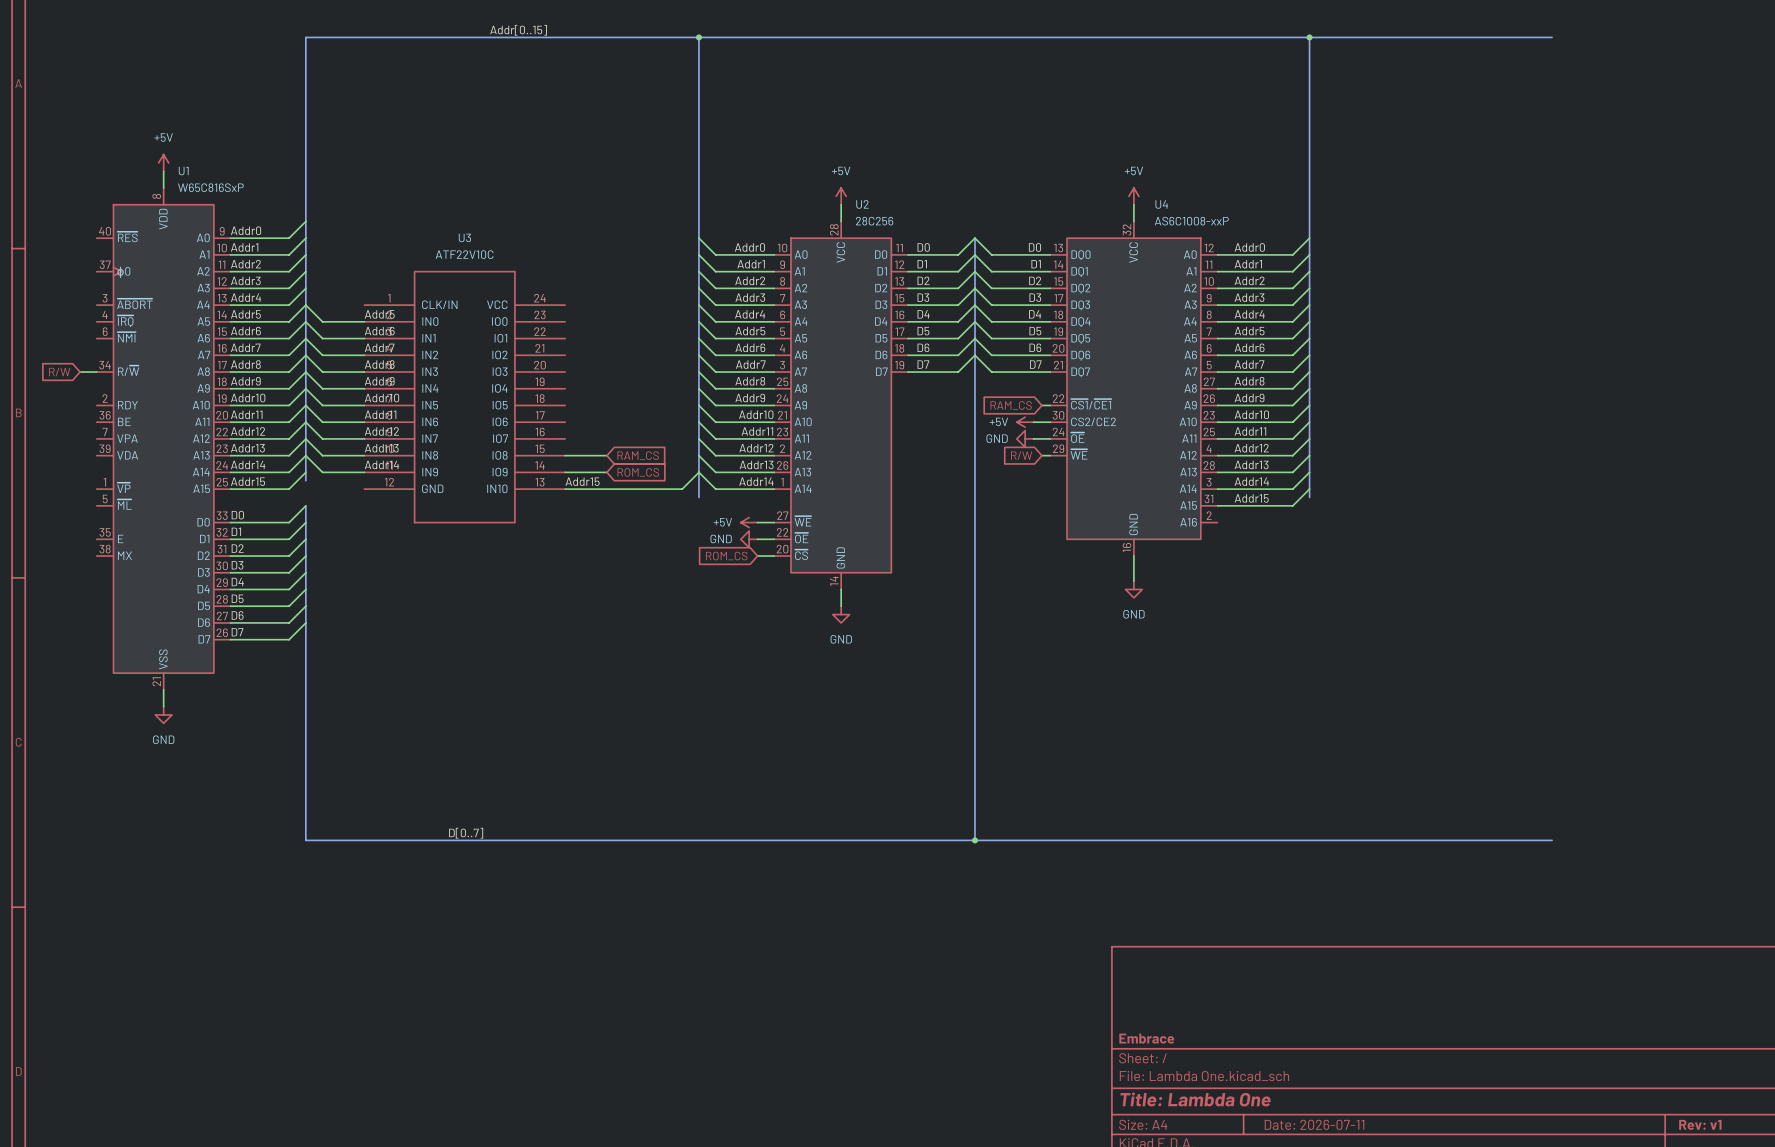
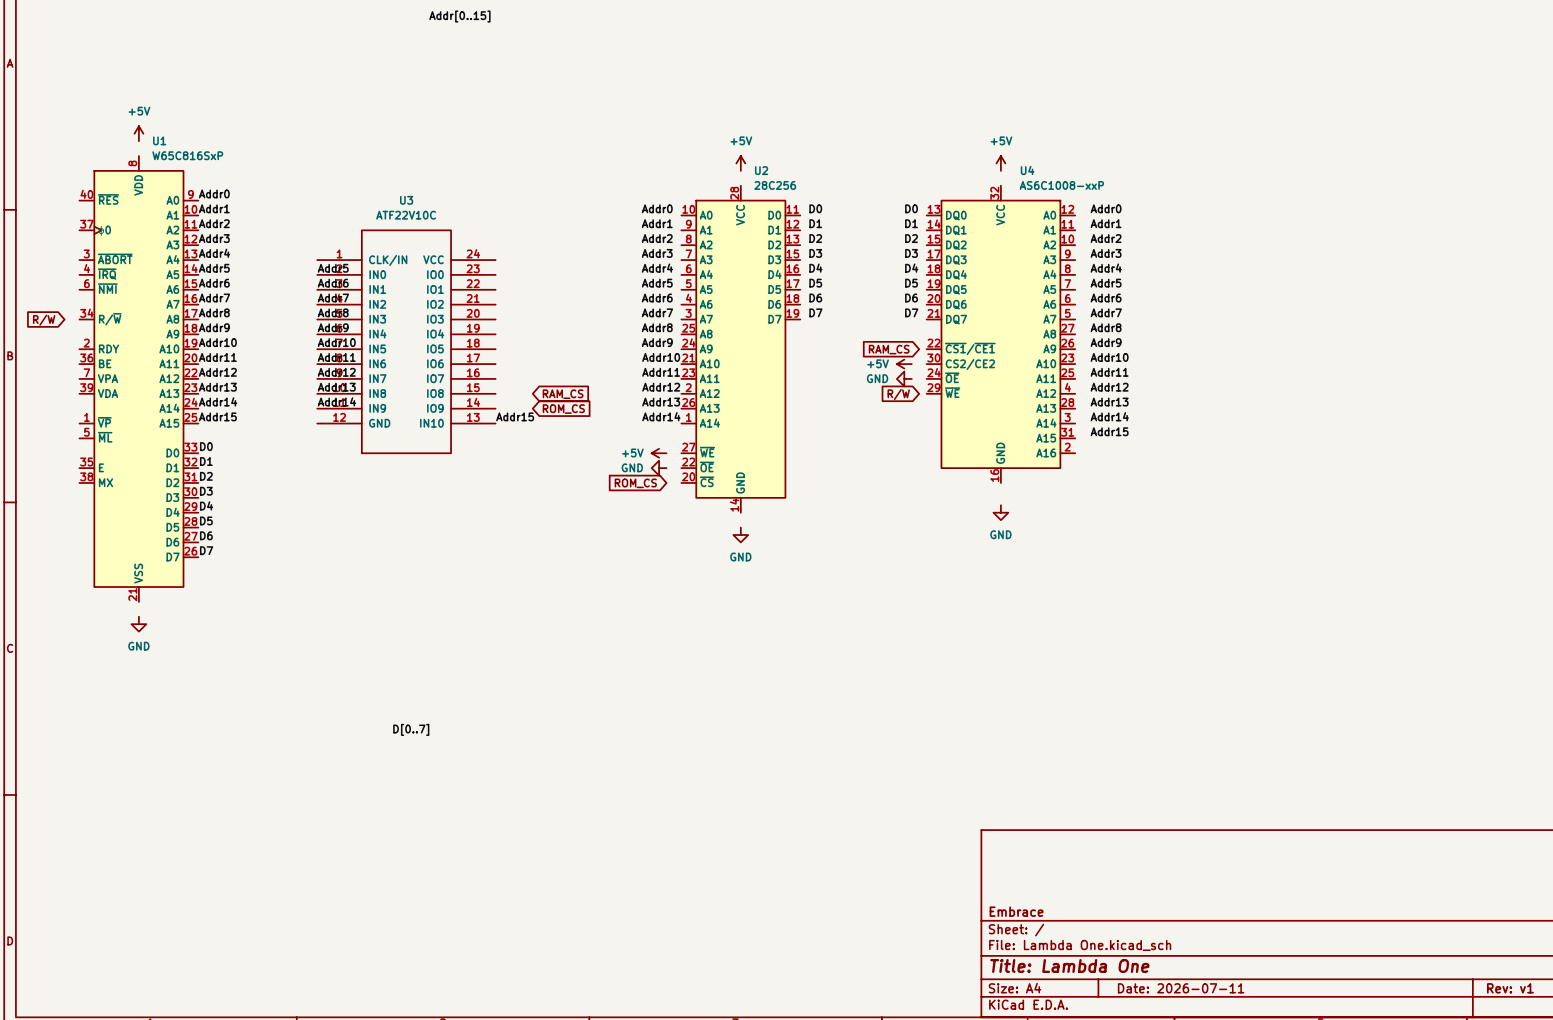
bus: (698, 37) (698, 497) -> none
junction: (698, 37) -> none
bus: (1309, 37) (1309, 497) -> none
junction: (1309, 37) -> none
bus: (1552, 37) (305, 37) (305, 480) -> none
wire: (163, 171) (163, 188) -> none
wire: (841, 204) (841, 221) -> none
wire: (1133, 204) (1133, 221) -> none
wire: (305, 221) (289, 238) (230, 238) -> none
wire: (305, 238) (289, 254) (230, 254) -> none
wire: (698, 238) (715, 254) (774, 254) -> none
bus: (974, 238) (974, 840) -> none
wire: (1309, 238) (1292, 254) (1217, 254) -> none
wire: (305, 254) (289, 271) (230, 271) -> none
wire: (698, 254) (715, 271) (774, 271) -> none
wire: (908, 254) (958, 254) (974, 238) (991, 254) (1050, 254) -> none
wire: (1309, 254) (1292, 271) (1217, 271) -> none
wire: (305, 271) (289, 288) (230, 288) -> none
wire: (698, 271) (715, 288) (774, 288) -> none
wire: (908, 271) (958, 271) (974, 254) (991, 271) (1050, 271) -> none
wire: (1309, 271) (1292, 288) (1217, 288) -> none
wire: (305, 288) (289, 305) (230, 305) -> none
wire: (698, 288) (715, 305) (774, 305) -> none
wire: (908, 288) (958, 288) (974, 271) (991, 288) (1050, 288) -> none
wire: (1309, 288) (1292, 305) (1217, 305) -> none
wire: (698, 305) (715, 321) (774, 321) -> none
wire: (908, 305) (958, 305) (974, 288) (991, 305) (1050, 305) -> none
wire: (1309, 305) (1292, 321) (1217, 321) -> none
wire: (230, 321) (289, 321) (305, 305) (322, 321) (364, 321) -> none
wire: (698, 321) (715, 338) (774, 338) -> none
wire: (908, 321) (958, 321) (974, 305) (991, 321) (1050, 321) -> none
wire: (1309, 321) (1292, 338) (1217, 338) -> none
wire: (230, 338) (289, 338) (305, 321) (322, 338) (364, 338) -> none
wire: (698, 338) (715, 355) (774, 355) -> none
wire: (908, 338) (958, 338) (974, 321) (991, 338) (1050, 338) -> none
wire: (1309, 338) (1292, 355) (1217, 355) -> none
wire: (230, 355) (289, 355) (305, 338) (322, 355) (364, 355) -> none
wire: (698, 355) (715, 372) (774, 372) -> none
wire: (908, 355) (958, 355) (974, 338) (991, 355) (1050, 355) -> none
wire: (1309, 355) (1292, 372) (1217, 372) -> none
wire: (80, 372) (96, 372) -> none
wire: (230, 372) (289, 372) (305, 355) (322, 372) (364, 372) -> none
wire: (698, 372) (715, 388) (774, 388) -> none
wire: (908, 372) (958, 372) (974, 355) (991, 372) (1050, 372) -> none
wire: (1309, 372) (1292, 388) (1217, 388) -> none
wire: (230, 388) (289, 388) (305, 372) (322, 388) (364, 388) -> none
wire: (698, 388) (715, 405) (774, 405) -> none
wire: (1309, 388) (1292, 405) (1217, 405) -> none
wire: (230, 405) (289, 405) (305, 388) (322, 405) (364, 405) -> none
wire: (698, 405) (715, 422) (774, 422) -> none
wire: (1041, 405) (1050, 405) -> none
wire: (1309, 405) (1292, 422) (1217, 422) -> none
wire: (230, 422) (289, 422) (305, 405) (322, 422) (364, 422) -> none
wire: (698, 422) (715, 438) (774, 438) -> none
wire: (1033, 422) (1050, 422) -> none
wire: (1309, 422) (1292, 438) (1217, 438) -> none
wire: (230, 438) (289, 438) (305, 422) (322, 438) (364, 438) -> none
wire: (698, 438) (715, 455) (774, 455) -> none
wire: (1033, 438) (1050, 438) -> none
wire: (1309, 438) (1292, 455) (1217, 455) -> none
wire: (230, 455) (289, 455) (305, 438) (322, 455) (364, 455) -> none
wire: (565, 455) (606, 455) -> none
wire: (698, 455) (715, 472) (774, 472) -> none
wire: (1041, 455) (1050, 455) -> none
wire: (1309, 455) (1292, 472) (1217, 472) -> none
wire: (230, 472) (289, 472) (305, 455) (322, 472) (364, 472) -> none
wire: (305, 472) (289, 489) (230, 489) -> none
wire: (565, 472) (606, 472) -> none
wire: (1309, 472) (1292, 489) (1217, 489) -> none
wire: (565, 489) (682, 489) (698, 472) (715, 489) (774, 489) -> none
wire: (1309, 489) (1292, 505) (1217, 505) -> none
wire: (305, 505) (289, 522) (230, 522) -> none
bus: (305, 505) (305, 840) (1552, 840) -> none
wire: (305, 522) (289, 539) (230, 539) -> none
wire: (757, 522) (774, 522) -> none
wire: (305, 539) (289, 556) (230, 556) -> none
wire: (757, 539) (774, 539) -> none
wire: (305, 556) (289, 572) (230, 572) -> none
wire: (757, 556) (774, 556) -> none
wire: (1133, 556) (1133, 581) -> none
wire: (305, 572) (289, 589) (230, 589) -> none
wire: (305, 589) (289, 606) (230, 606) -> none
wire: (841, 589) (841, 606) -> none
wire: (305, 606) (289, 622) (230, 622) -> none
wire: (305, 622) (289, 639) (230, 639) -> none
wire: (163, 689) (163, 706) -> none
junction: (974, 840) -> none

